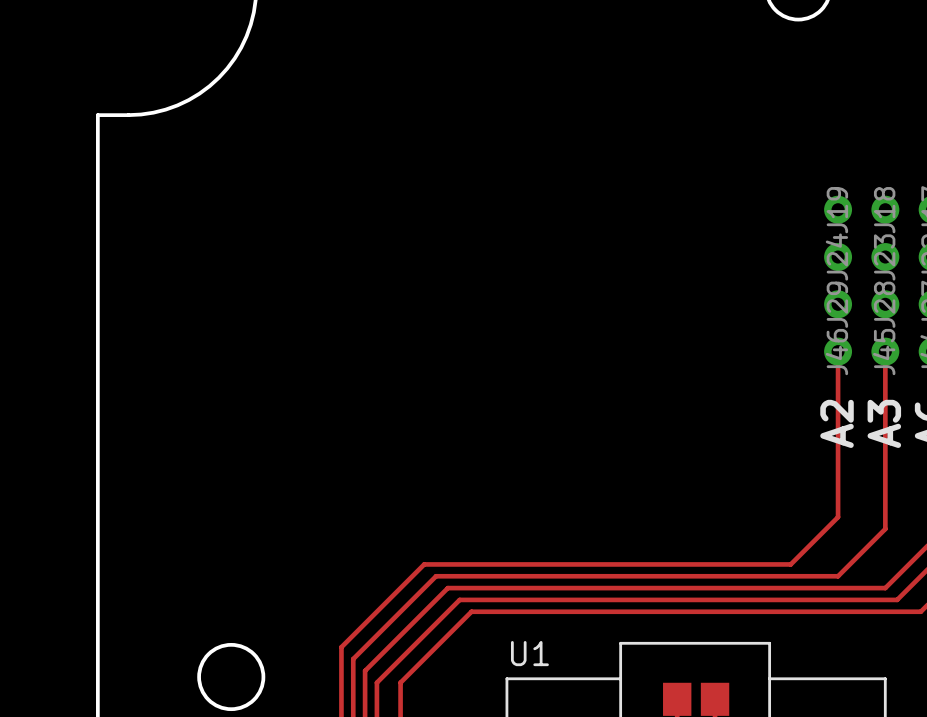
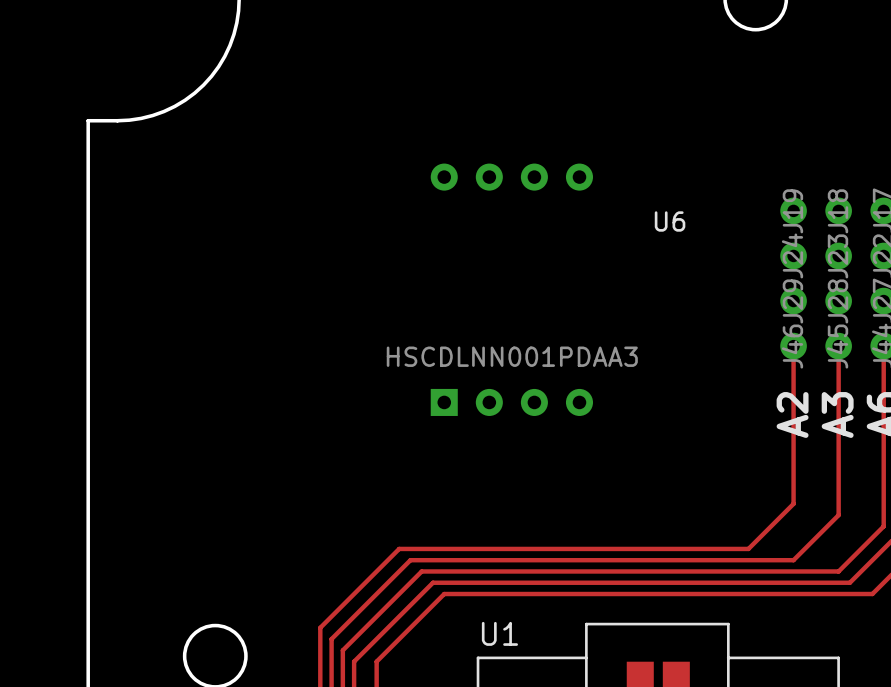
U6: none -> HSCDLNN001PDAA3 (511, 289)

